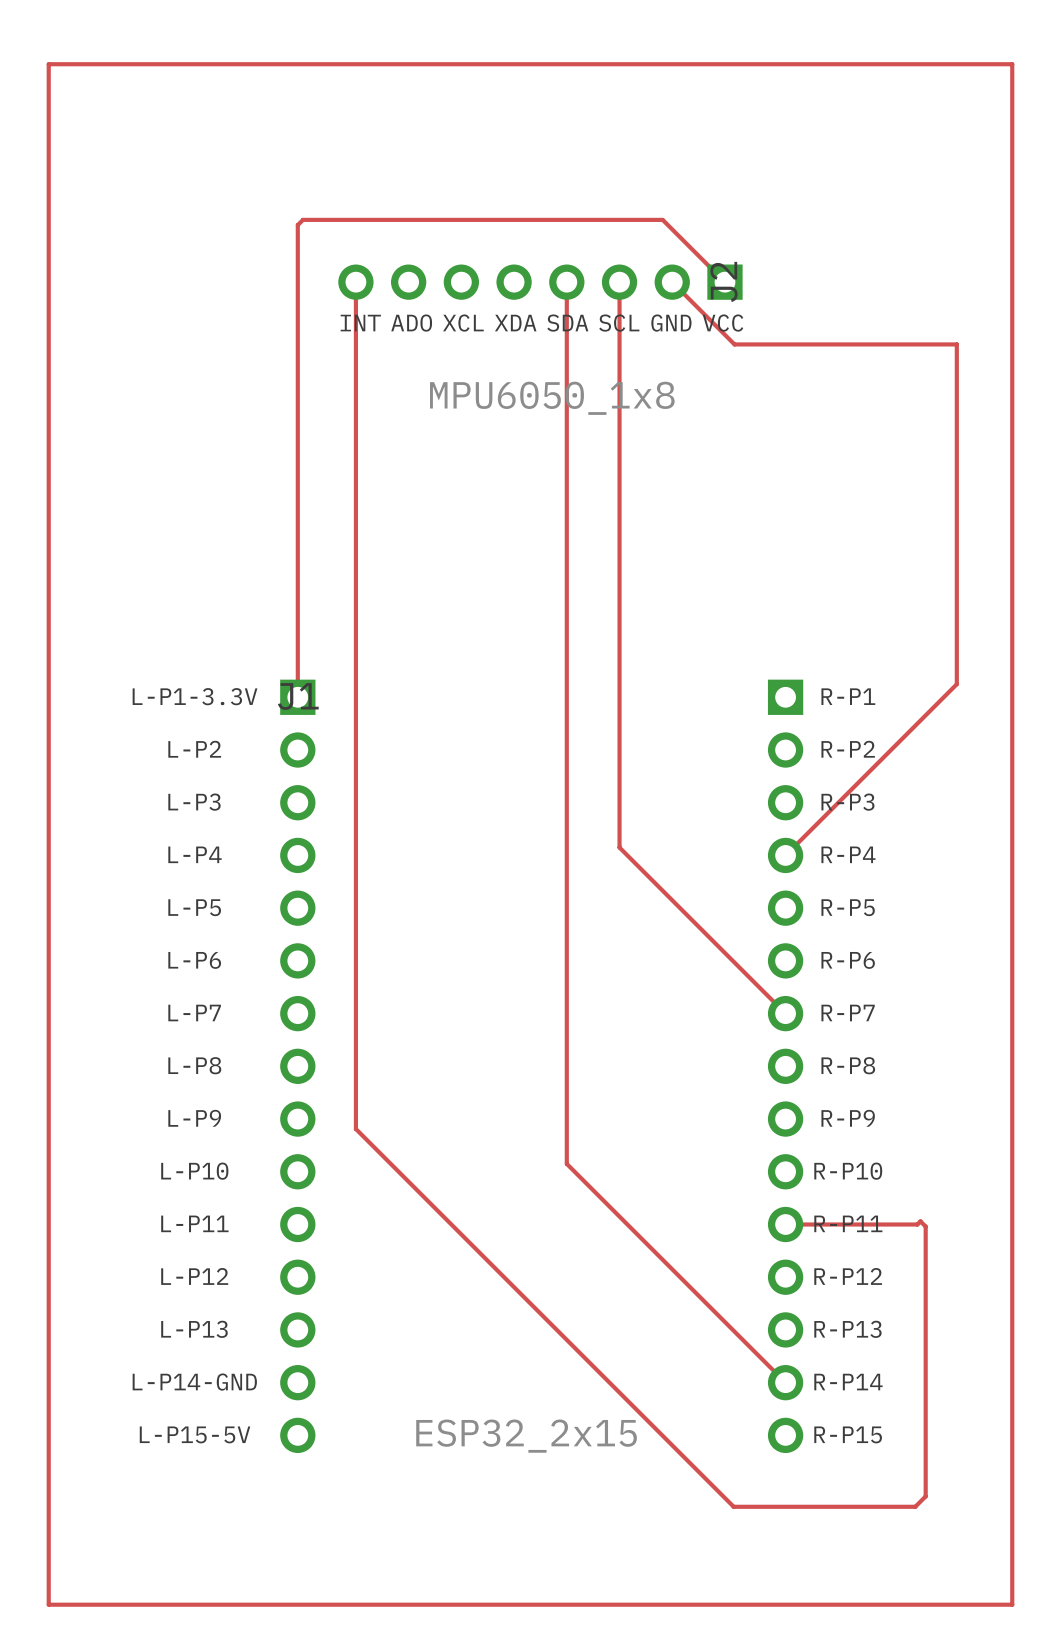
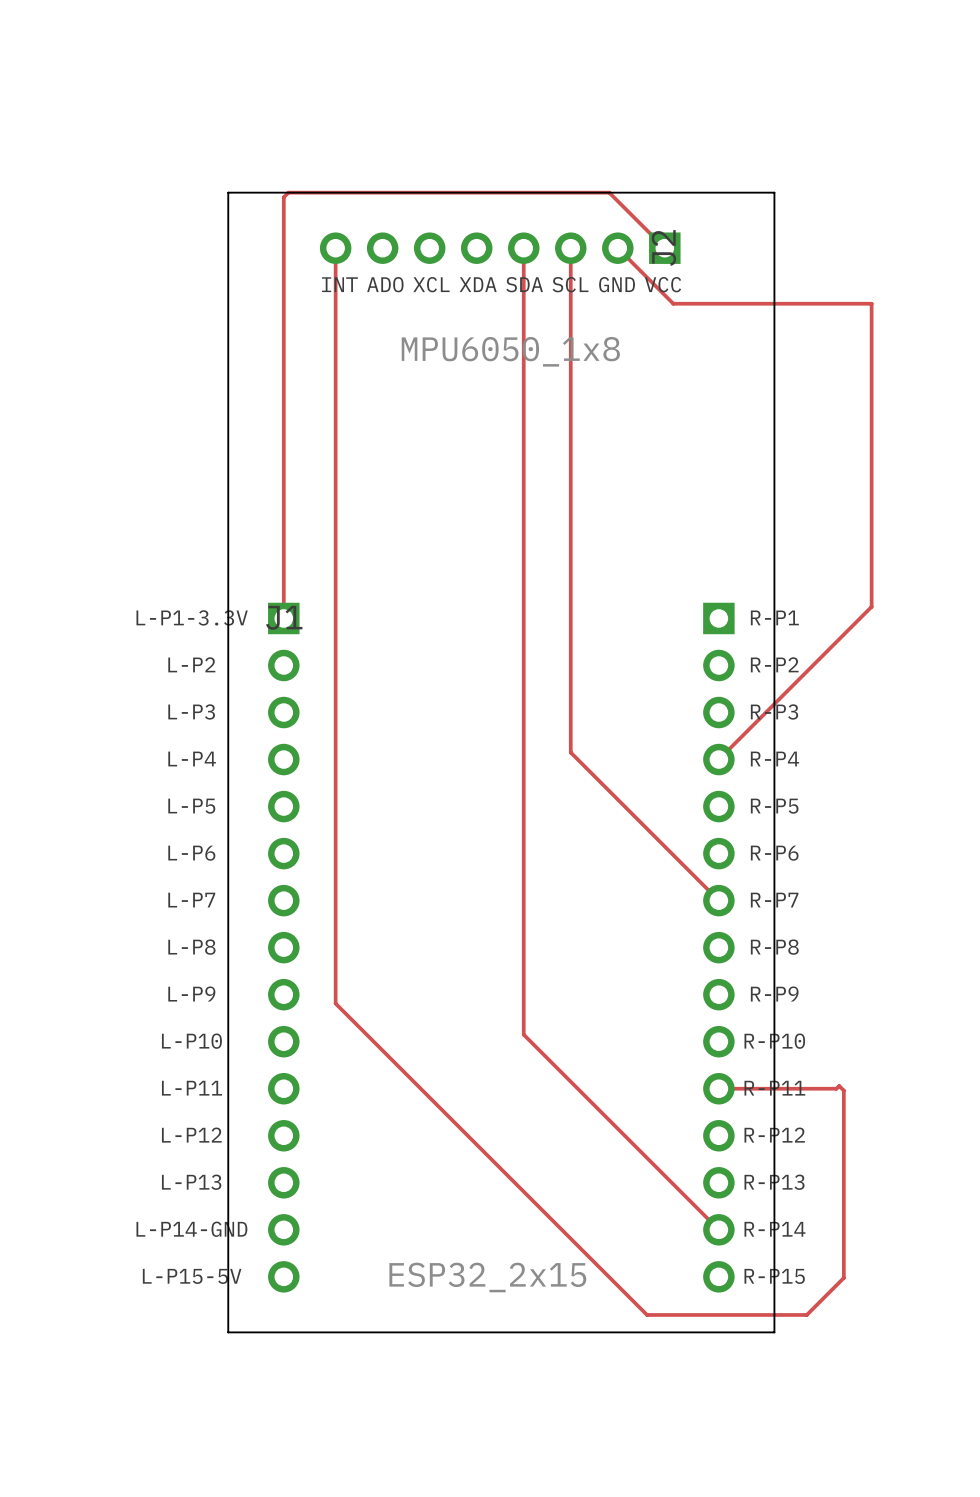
track: (48, 64) (1012, 64) (1012, 1604) (48, 1604) (48, 64) -> none
board edge: none -> (228, 192) (774, 192) (774, 1332) (228, 1332) (228, 192)
track: (925, 1436) (925, 1496) (915, 1506) (733, 1506) (705, 1478) -> (843, 1277) (806, 1314) (647, 1314)

